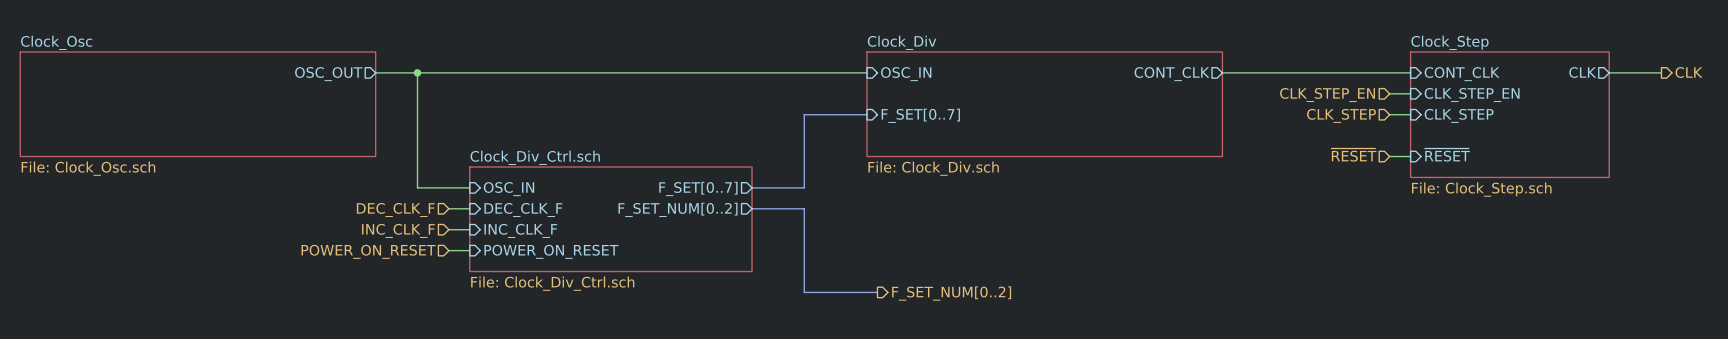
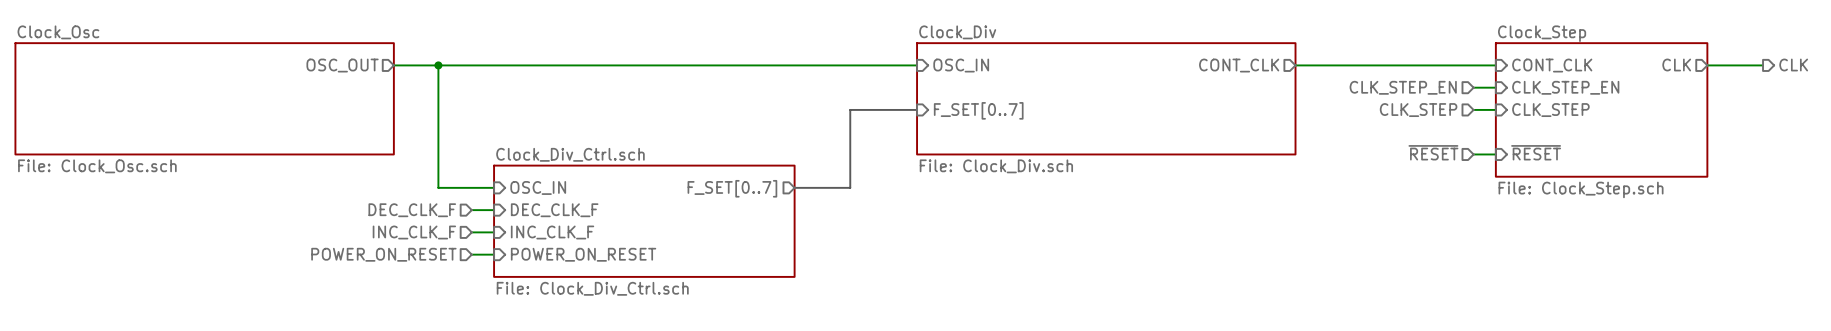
bus: (752, 208) (804, 208) (804, 292) (877, 292) -> none
sheet pin: F_SET_NUM[0..2] (678, 209) -> none
hierarchical label: F_SET_NUM[0..2] (951, 293) -> none

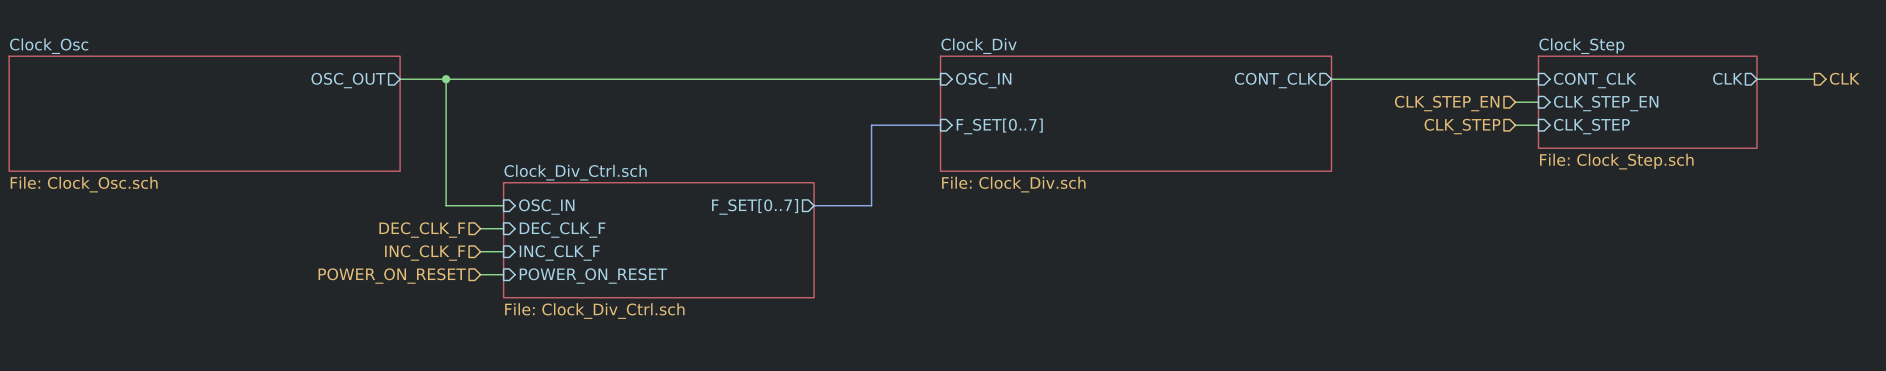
sheet Clock_Step: none -> File: Clock_Step.sch (1647, 102)
sheet Clock_Step: File: Clock_Step.sch (1601, 109) -> none
hierarchical label: ~{RESET} (1433, 152) -> none
sheet pin: ~{RESET} (1536, 152) -> none
wire: (1473, 154) (1495, 154) -> none

